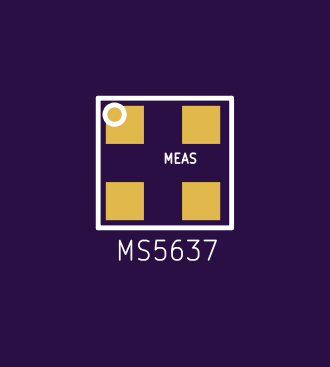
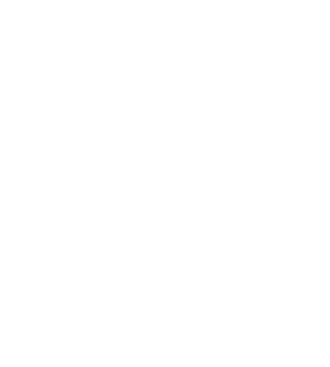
part: (164, 163) -> none

